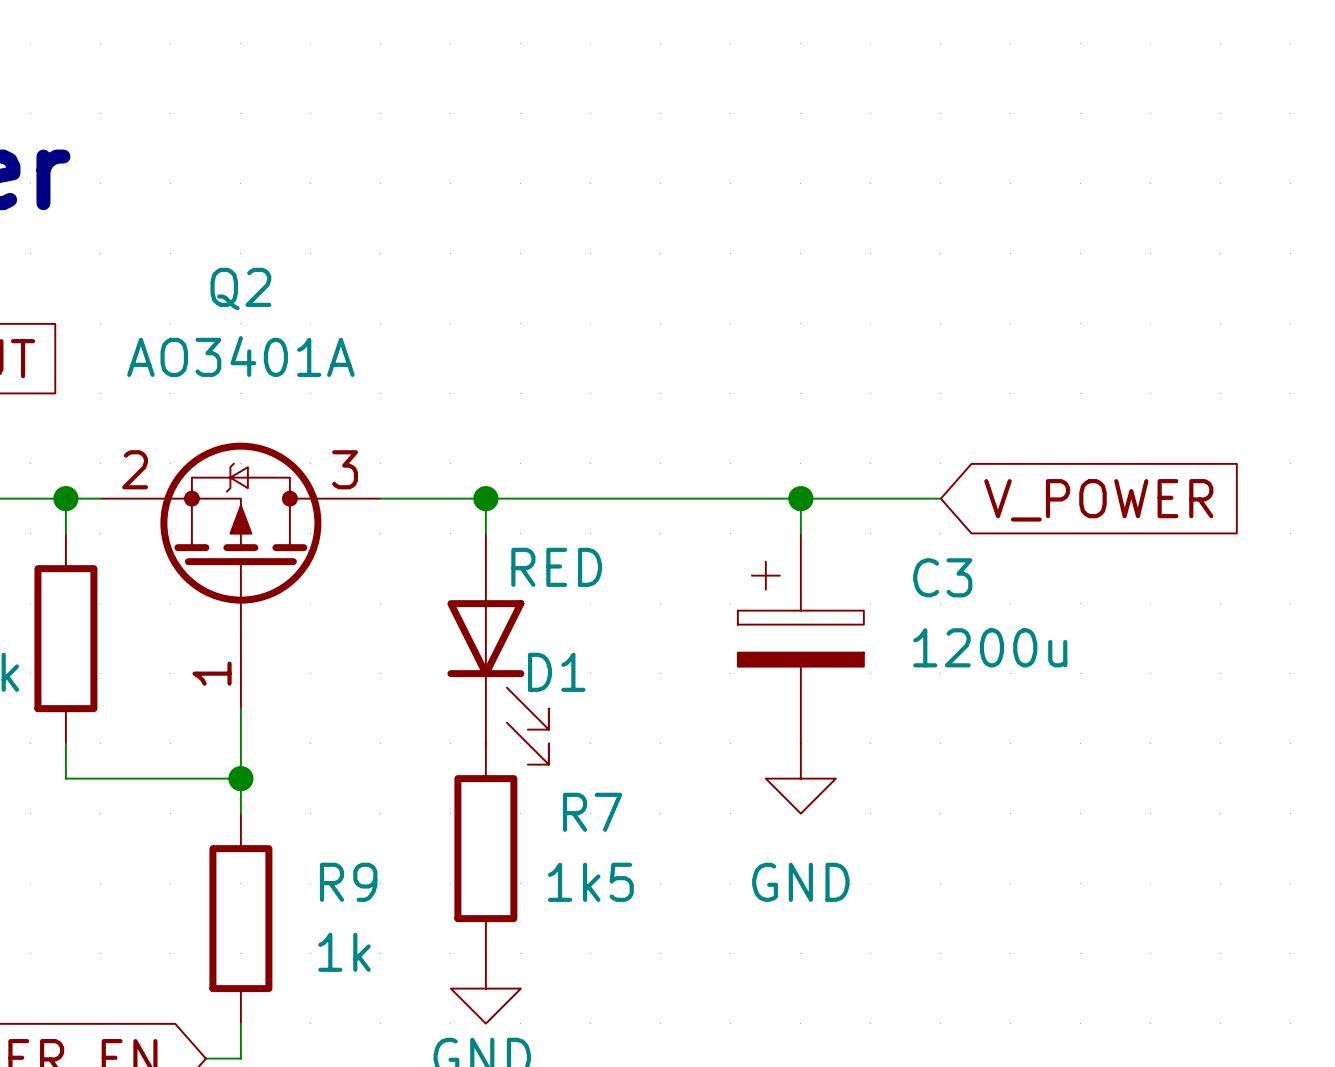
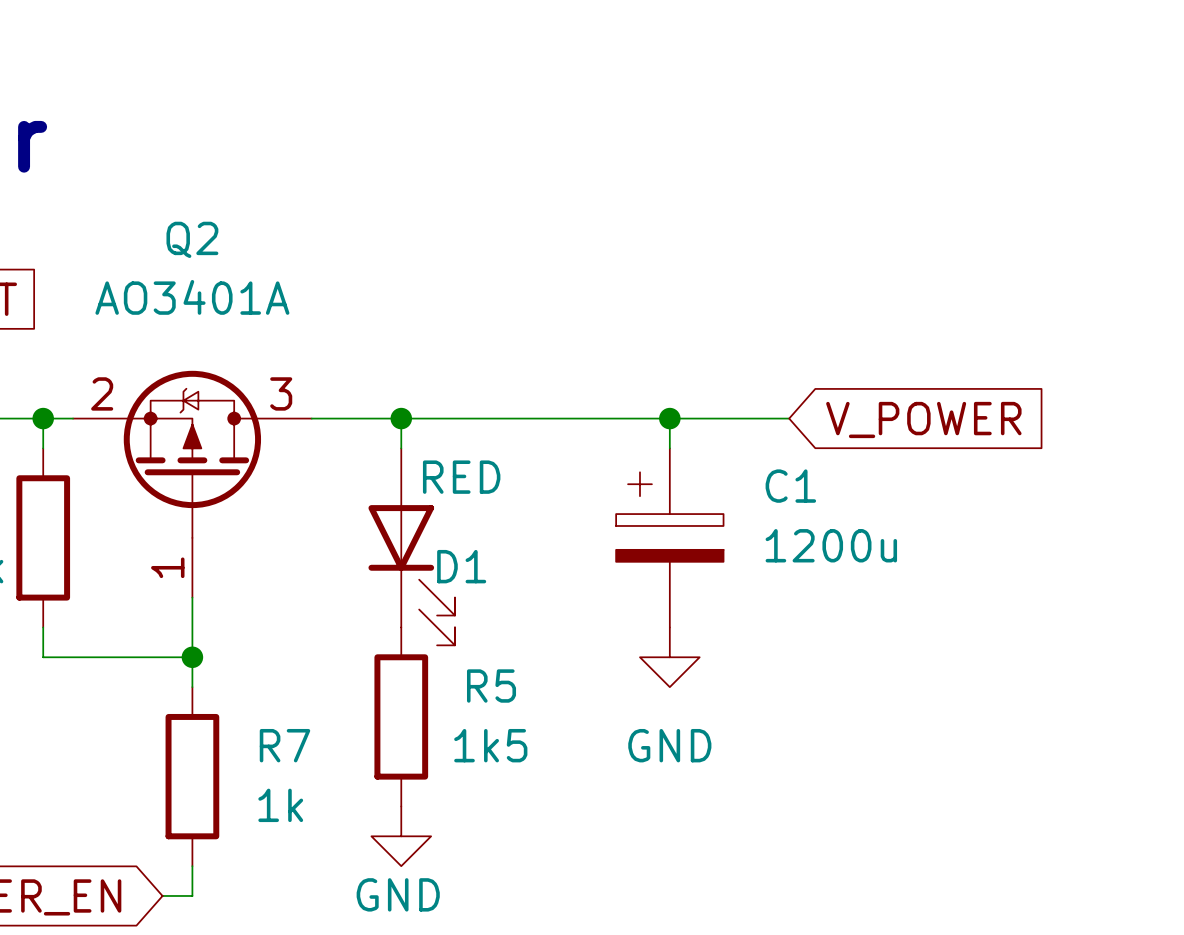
C3 name: C3 (942, 577) -> C1 (790, 486)
R7 name: R7 (592, 812) -> R5 (491, 686)
R9 name: R9 (348, 882) -> R7 (284, 745)

